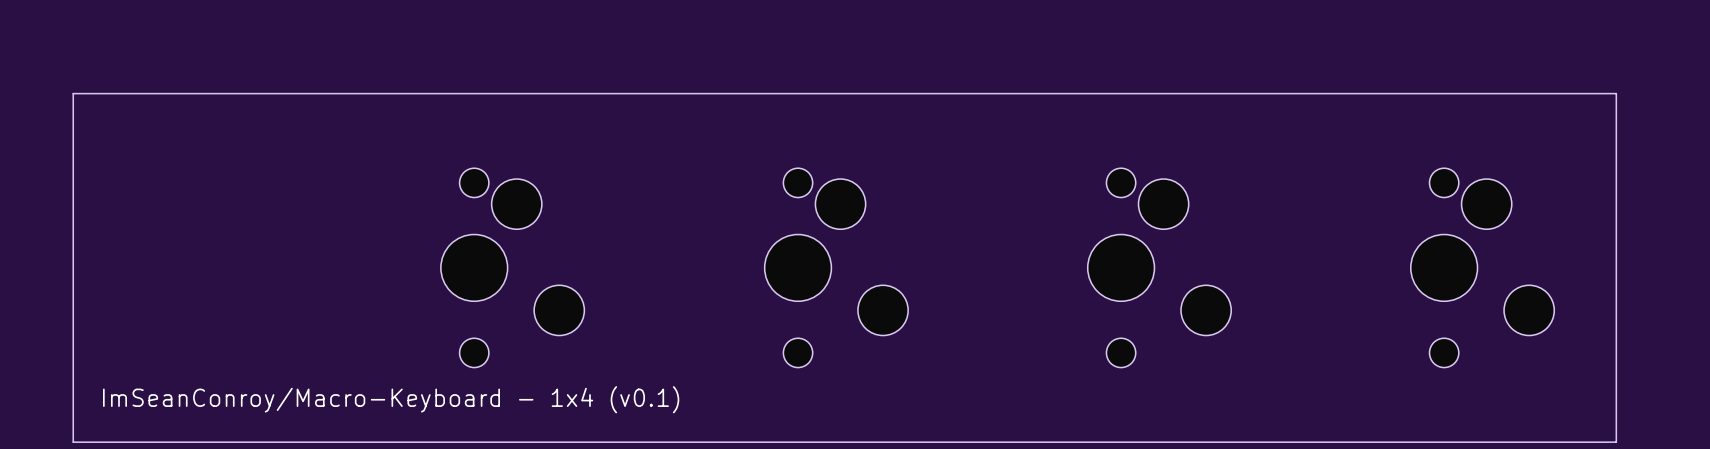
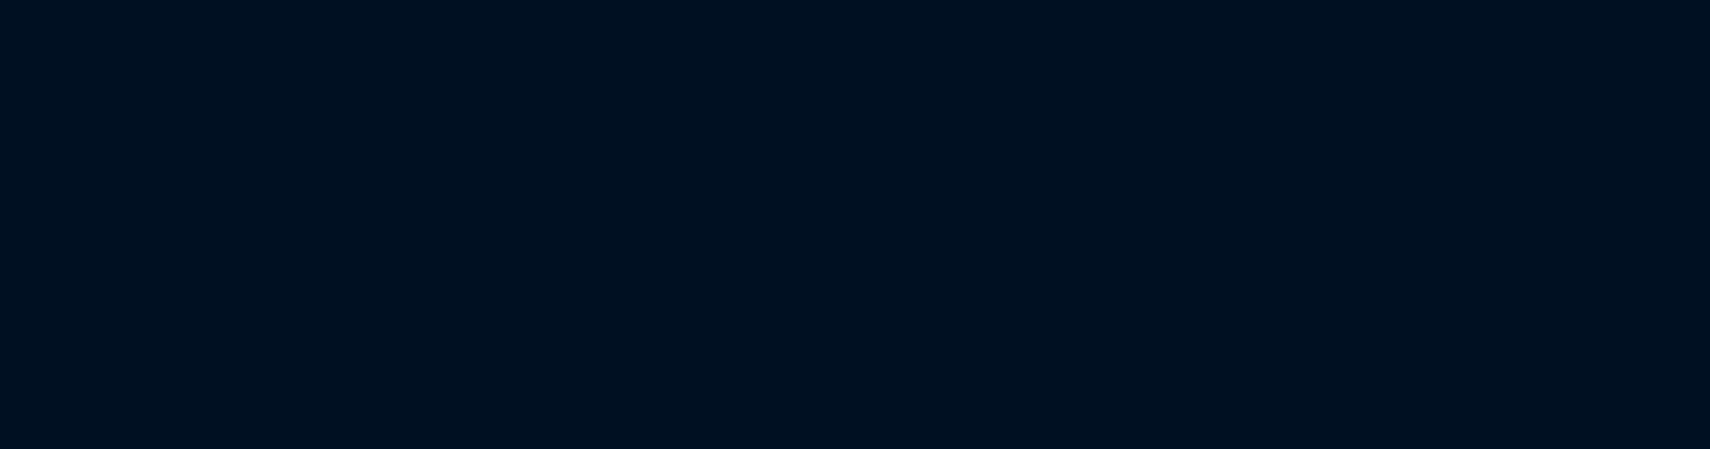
board edge: (73, 93) (1616, 93) (1616, 442) (73, 442) (73, 93) -> none
part: (512, 267) -> none
part: (836, 267) -> none
part: (1159, 267) -> none
part: (1482, 267) -> none
text: ImSeanConroy/Macro-Keyboard - 1x4 (v0.1) (391, 399) -> none

